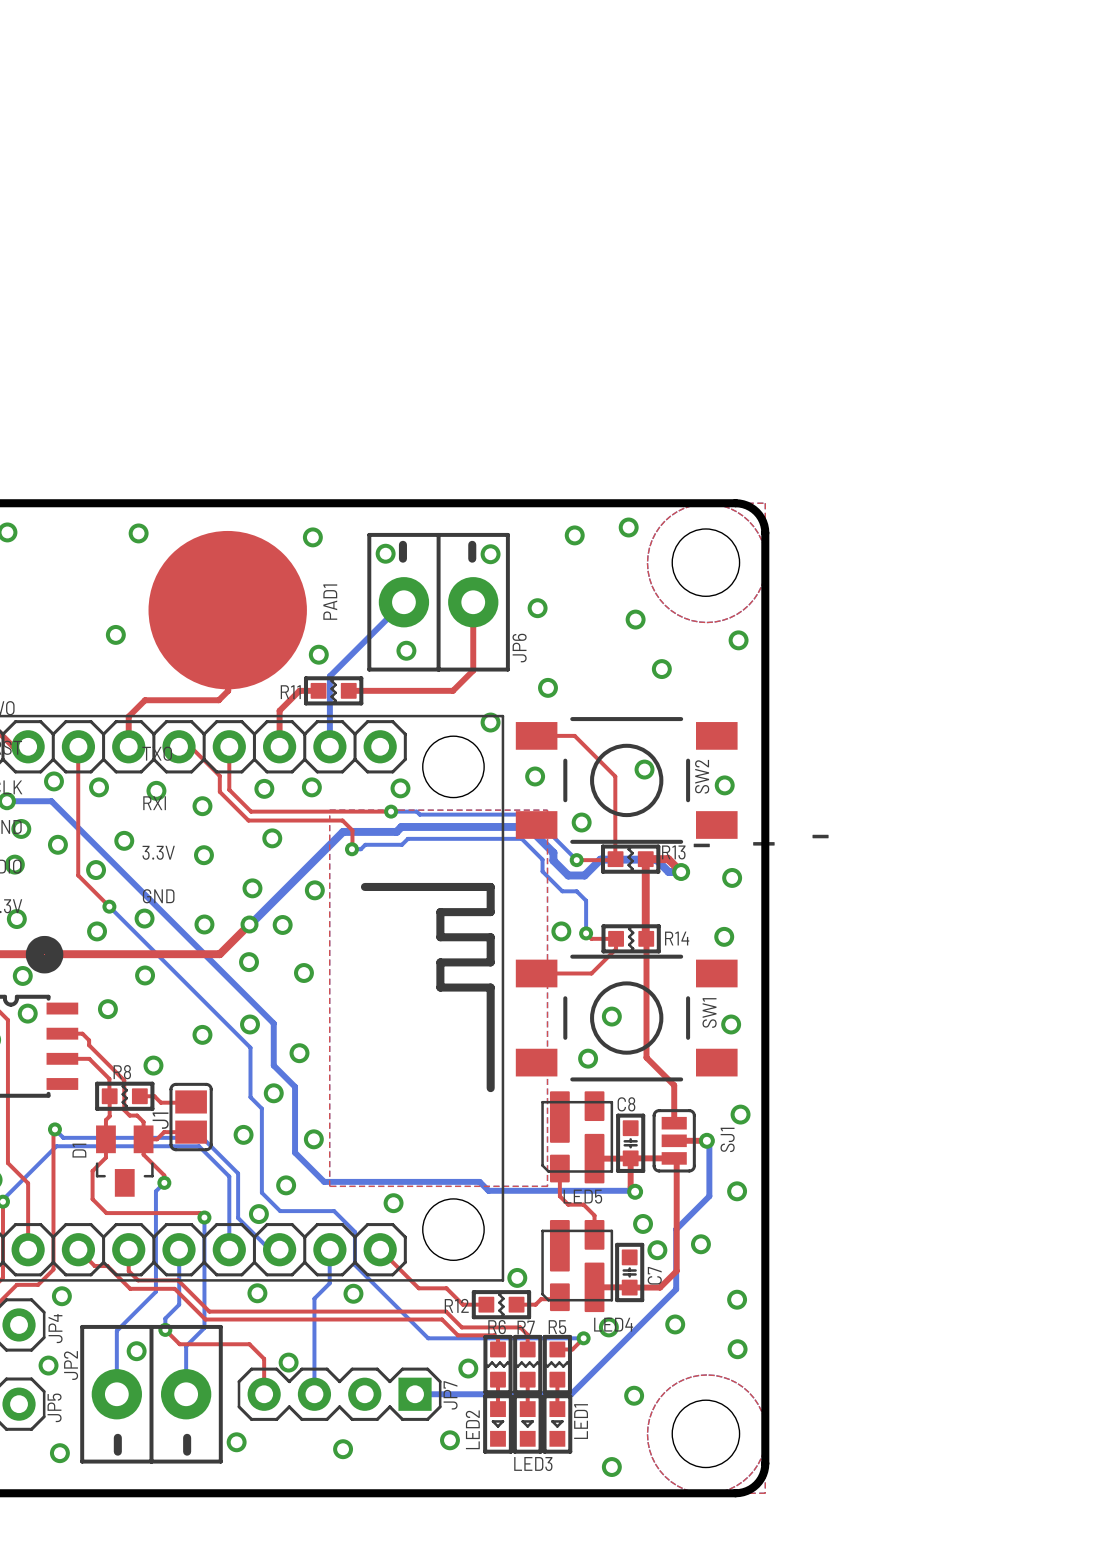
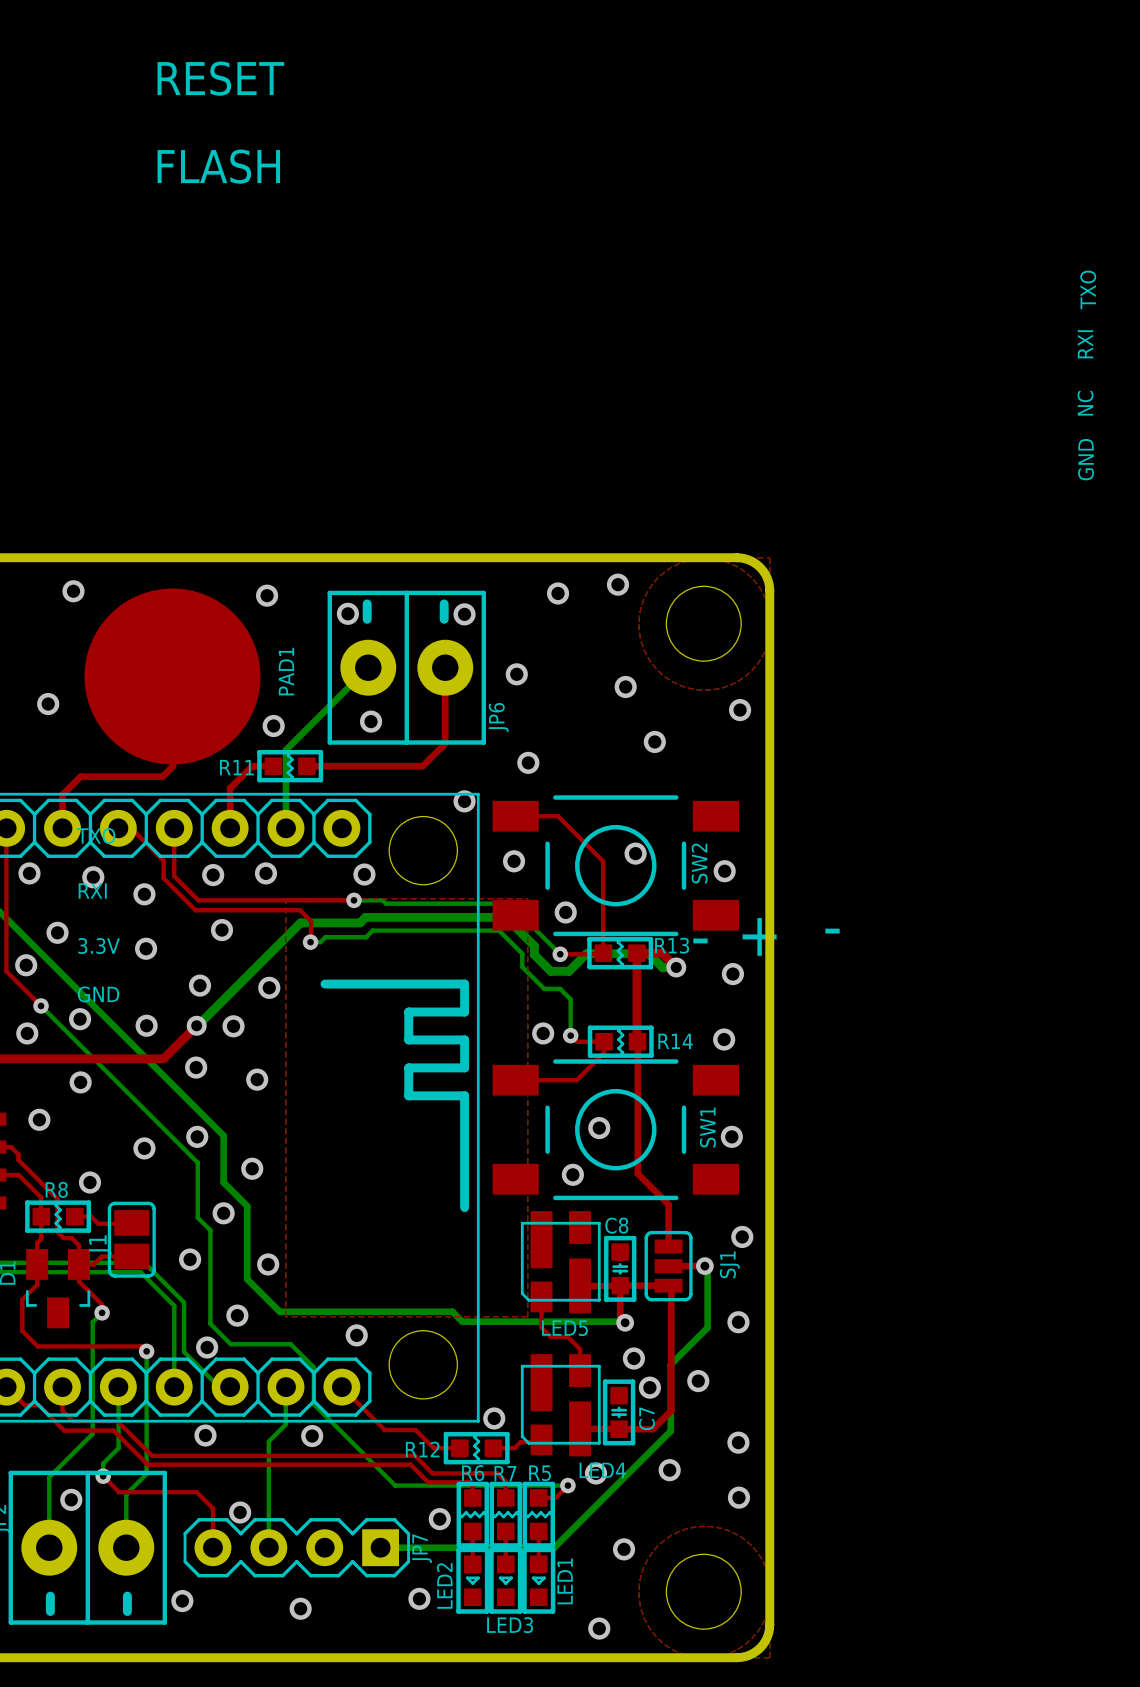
text: none -> RESET (220, 78)
text: none -> FLASH (218, 166)
text: none -> TXO (1088, 289)
text: none -> RXI (1085, 344)
text: none -> NC (1085, 403)
text: none -> GND (1086, 459)

